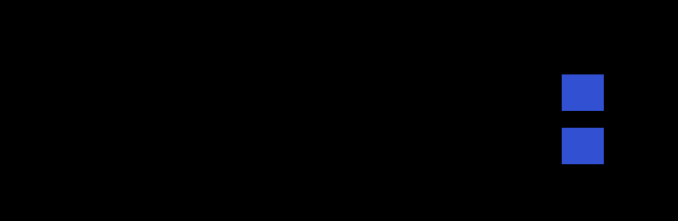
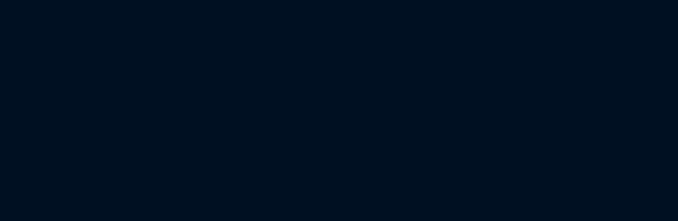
part: (582, 119) -> none

